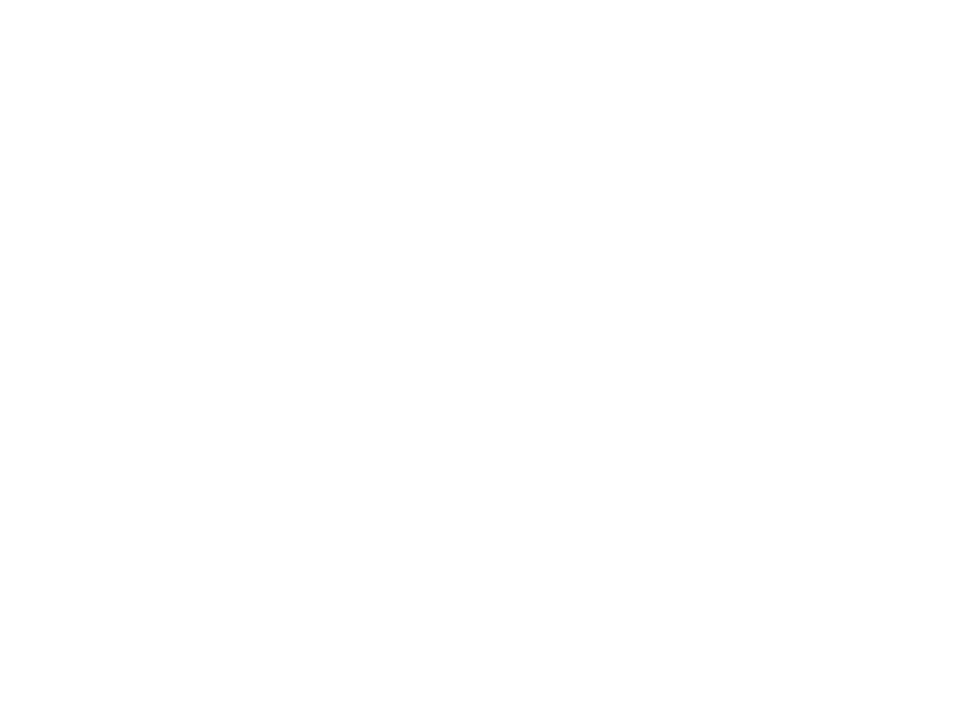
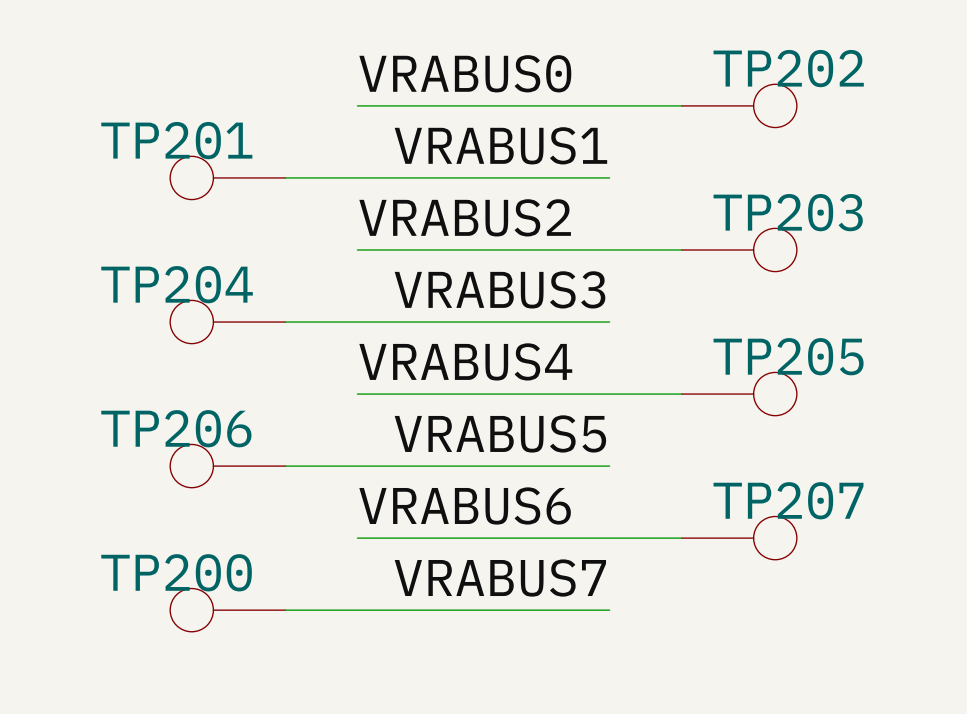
label: none -> VRABUS0 (465, 73)
wire: none -> (357, 105) (681, 105)
TP202: none -> (739, 105)
label: none -> VRABUS1 (500, 145)
TP201: none -> (227, 177)
wire: none -> (285, 177) (609, 177)
label: none -> VRABUS2 (465, 217)
wire: none -> (357, 249) (681, 249)
TP203: none -> (739, 249)
label: none -> VRABUS3 (500, 289)
TP204: none -> (227, 322)
wire: none -> (285, 322) (609, 322)
label: none -> VRABUS4 (465, 361)
wire: none -> (357, 394) (681, 394)
TP205: none -> (739, 394)
label: none -> VRABUS5 (500, 433)
TP206: none -> (227, 466)
wire: none -> (285, 466) (609, 466)
label: none -> VRABUS6 (465, 505)
wire: none -> (357, 538) (681, 538)
TP207: none -> (739, 538)
label: none -> VRABUS7 (500, 578)
TP200: none -> (227, 610)
wire: none -> (285, 610) (609, 610)

